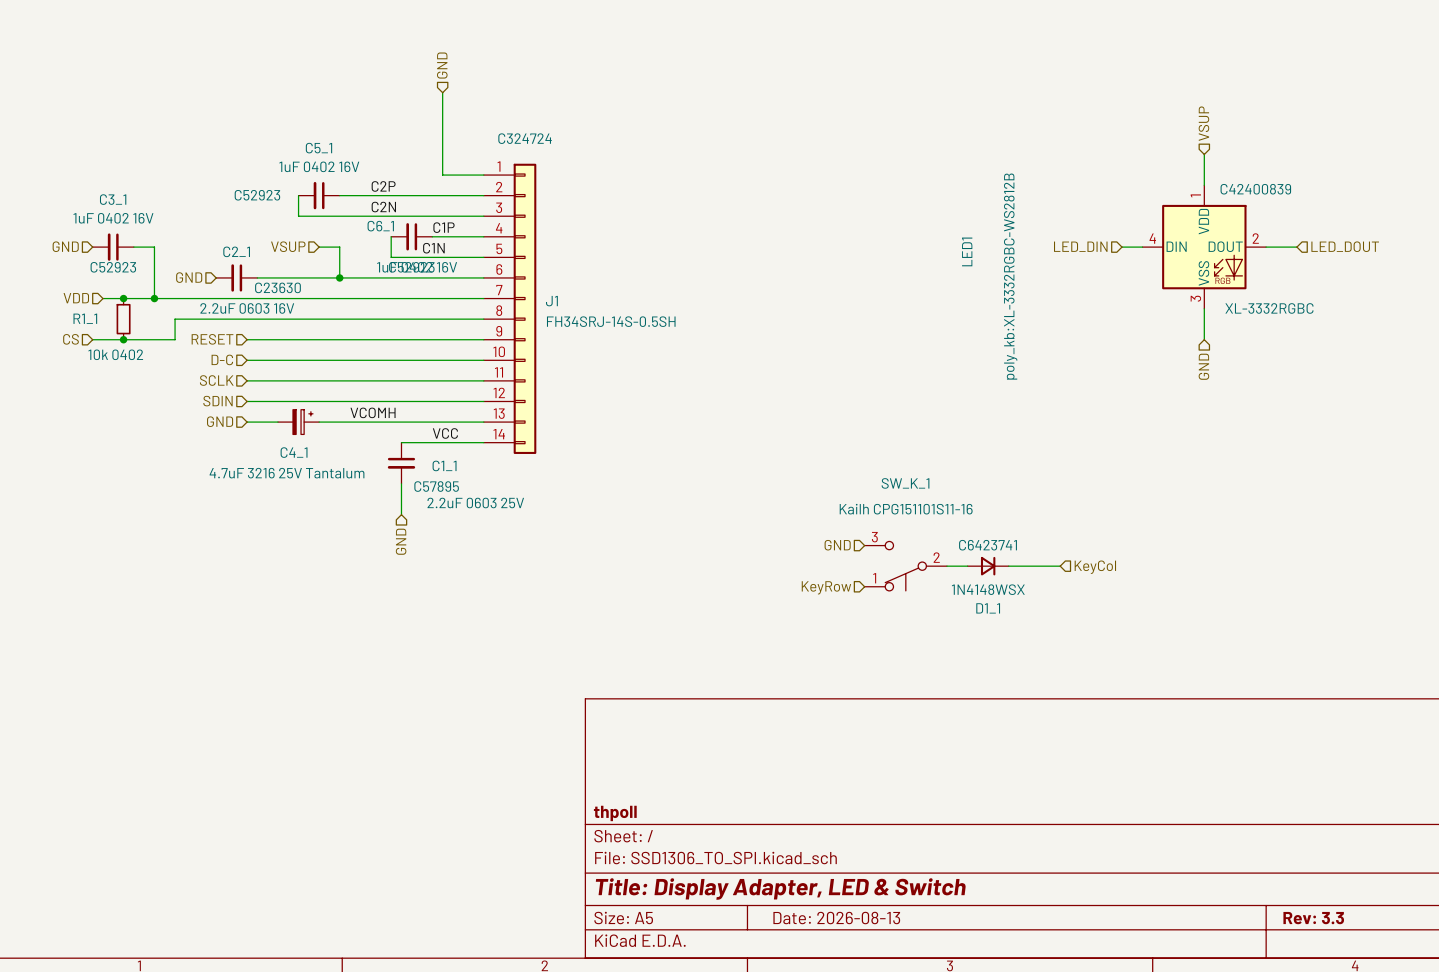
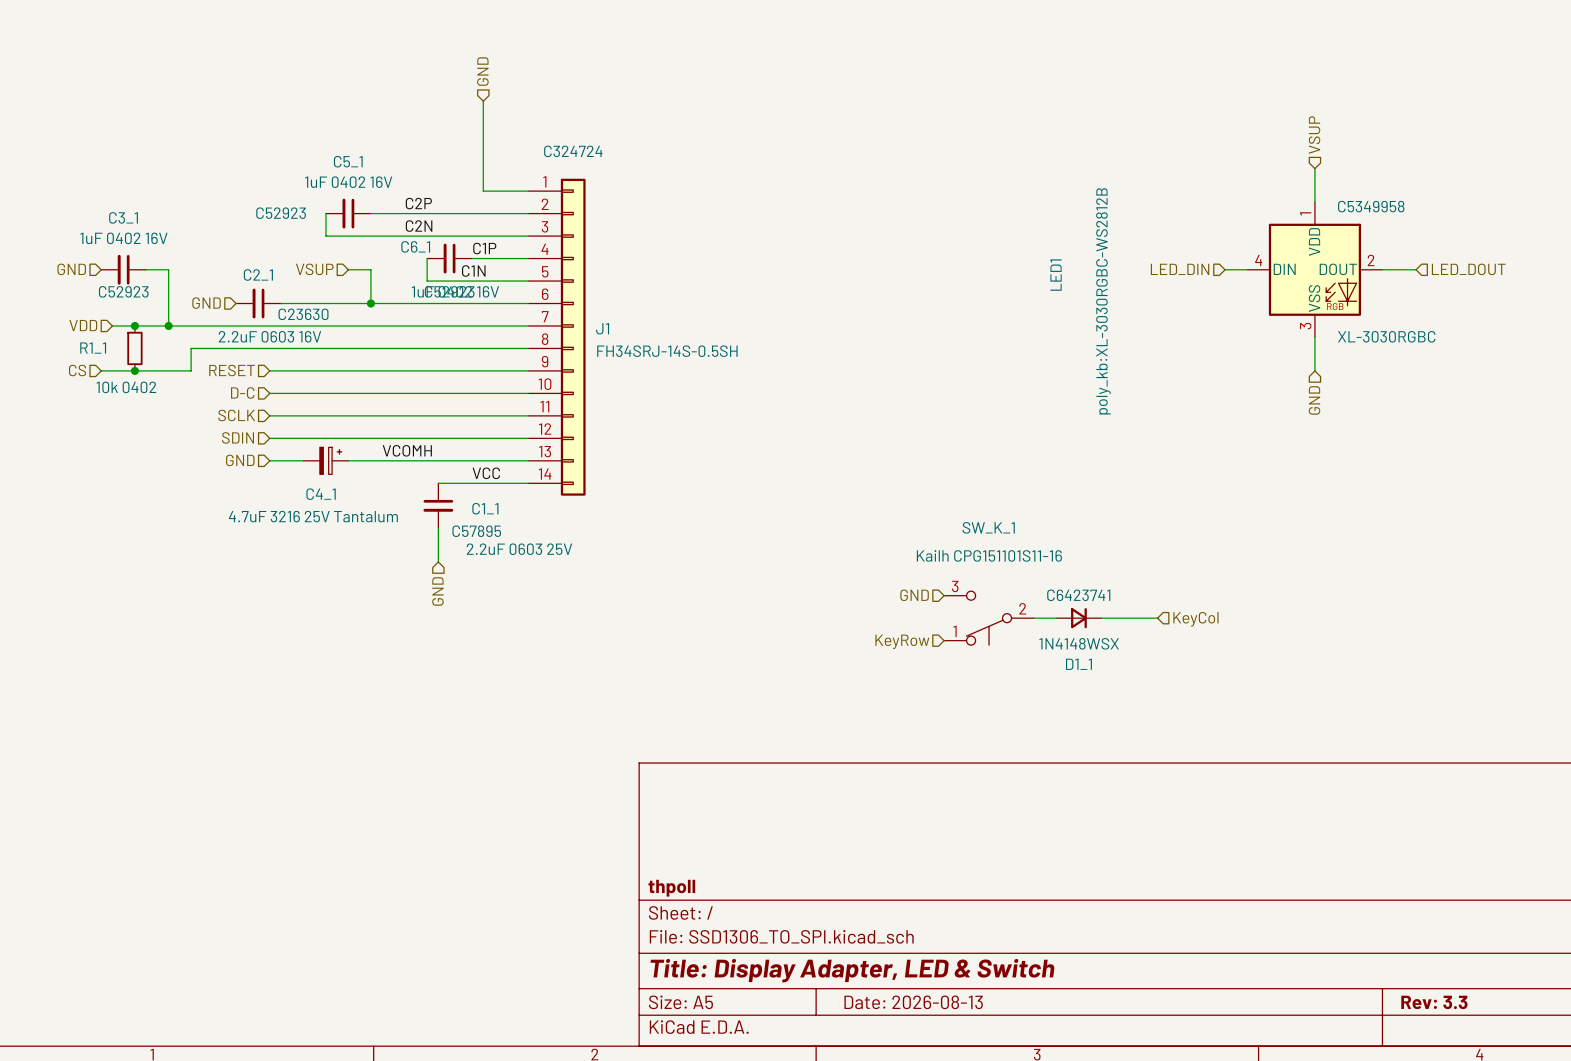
LED1 text: C42400839 (1255, 189) -> C5349958 (1371, 206)
LED1 text: poly_kb:XL-3332RGBC-WS2812B (1010, 276) -> poly_kb:XL-3030RGBC-WS2812B (1103, 301)
LED1 value: XL-3332RGBC (1269, 308) -> XL-3030RGBC (1386, 336)

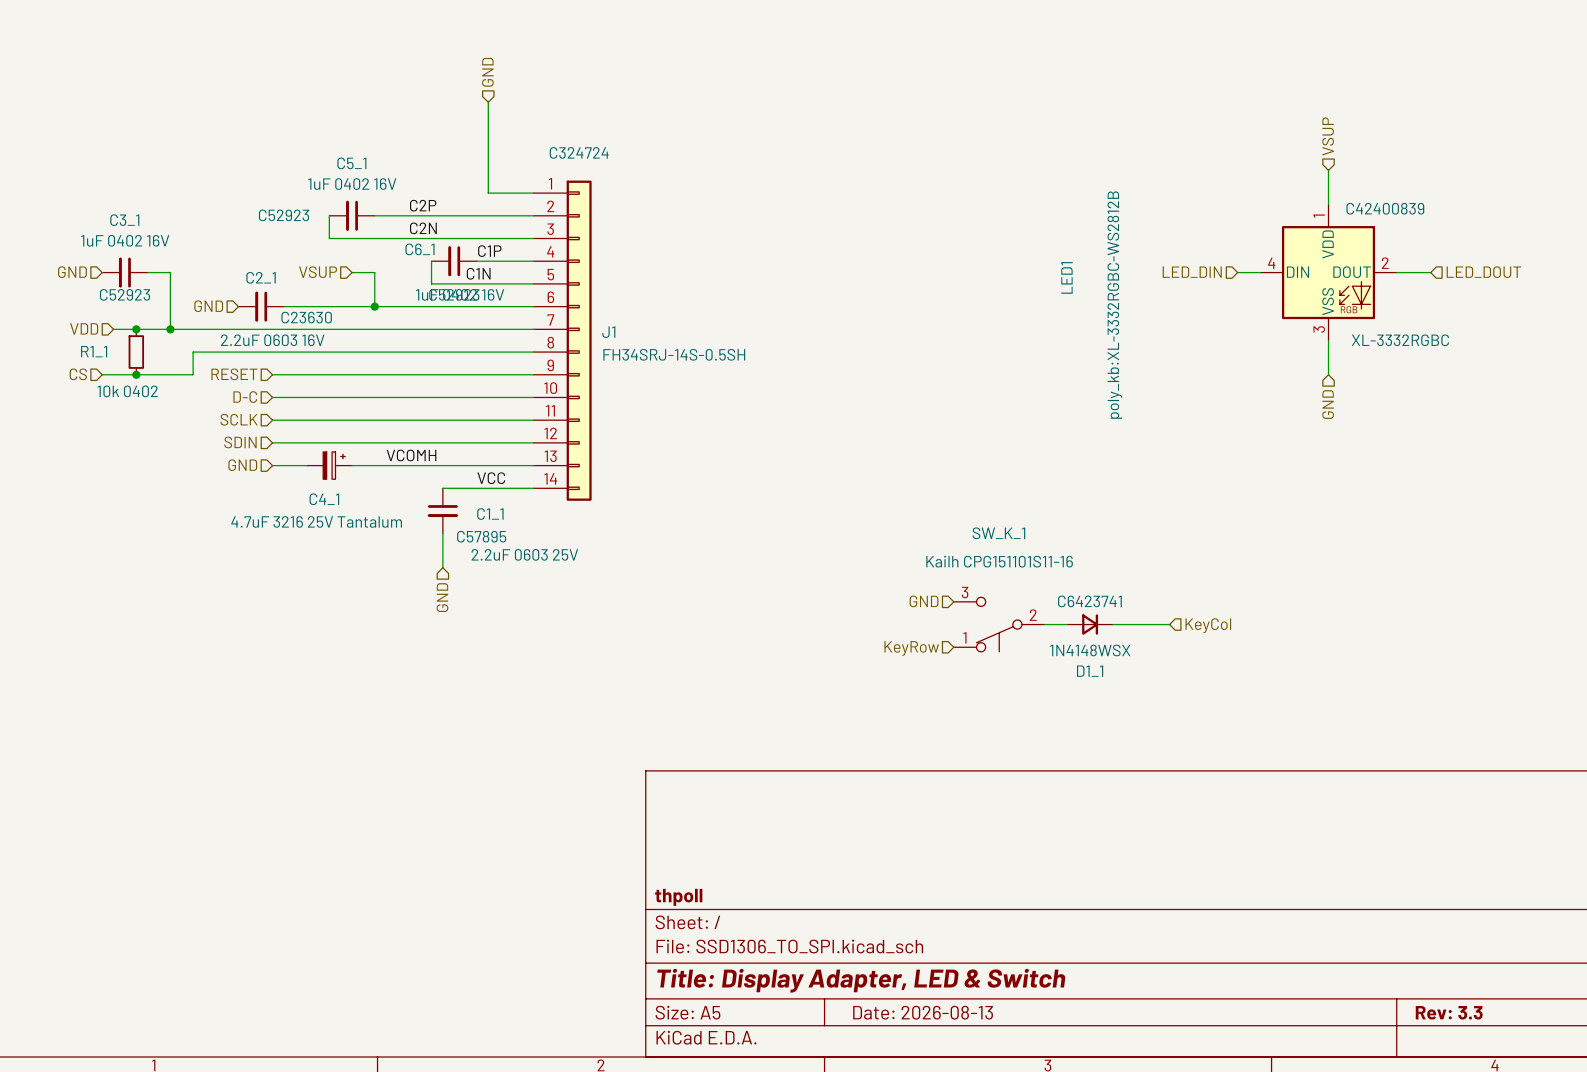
LED1 text: C5349958 (1371, 206) -> C42400839 (1385, 208)
LED1 text: poly_kb:XL-3030RGBC-WS2812B (1103, 301) -> poly_kb:XL-3332RGBC-WS2812B (1114, 305)
LED1 value: XL-3030RGBC (1386, 336) -> XL-3332RGBC (1400, 340)

